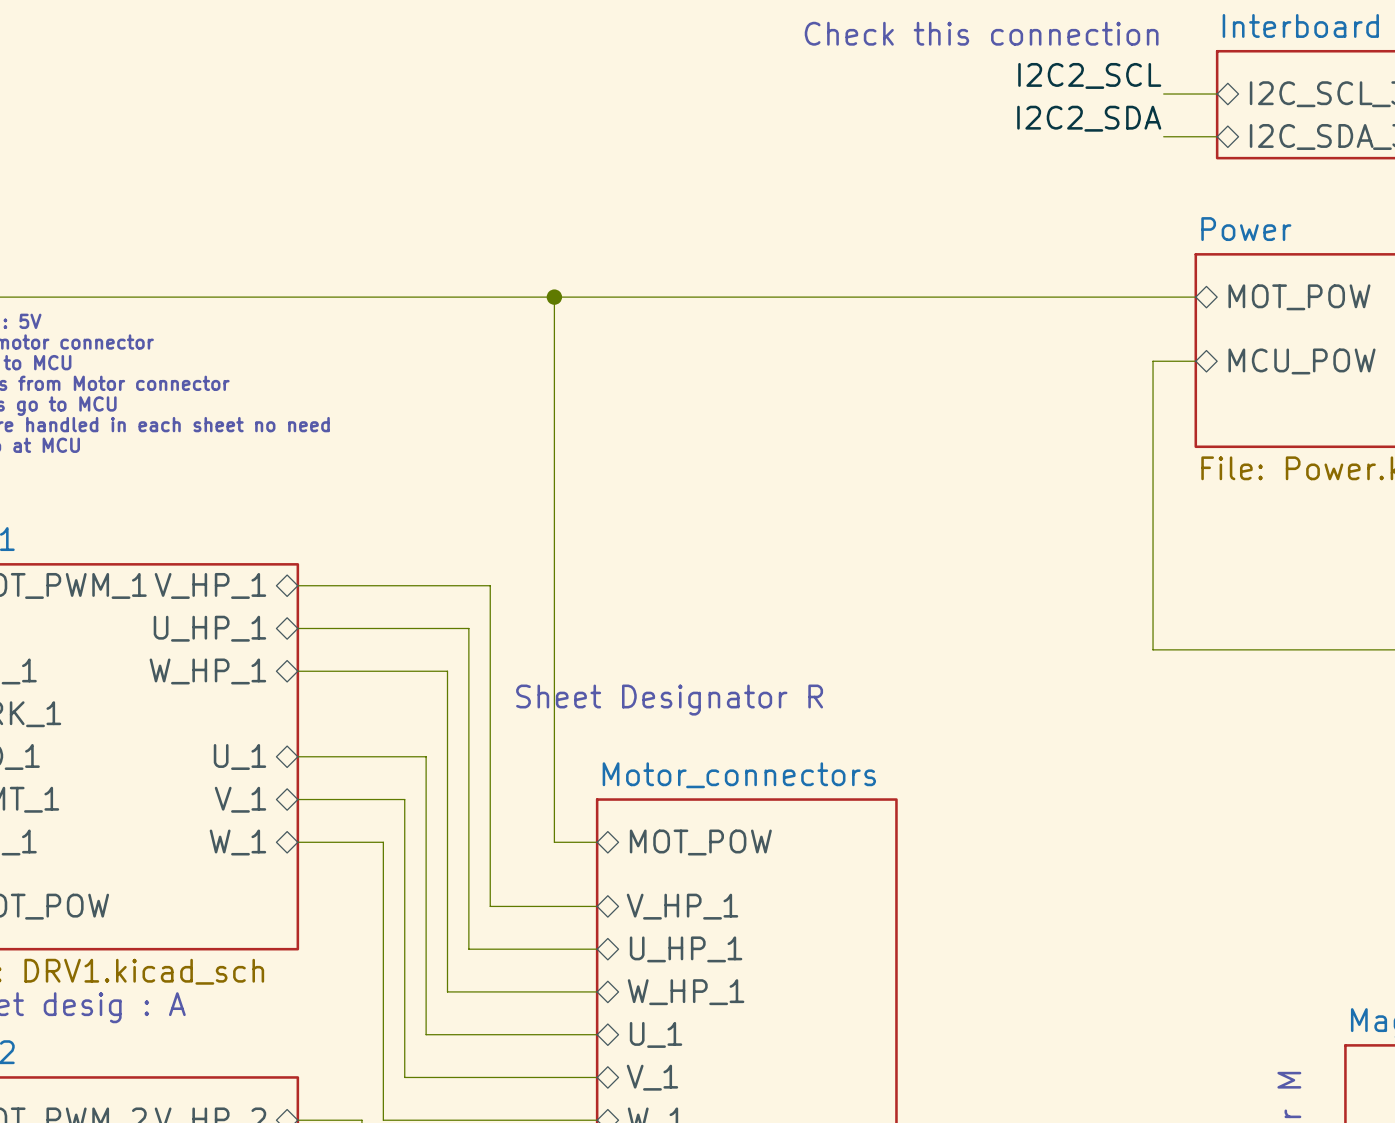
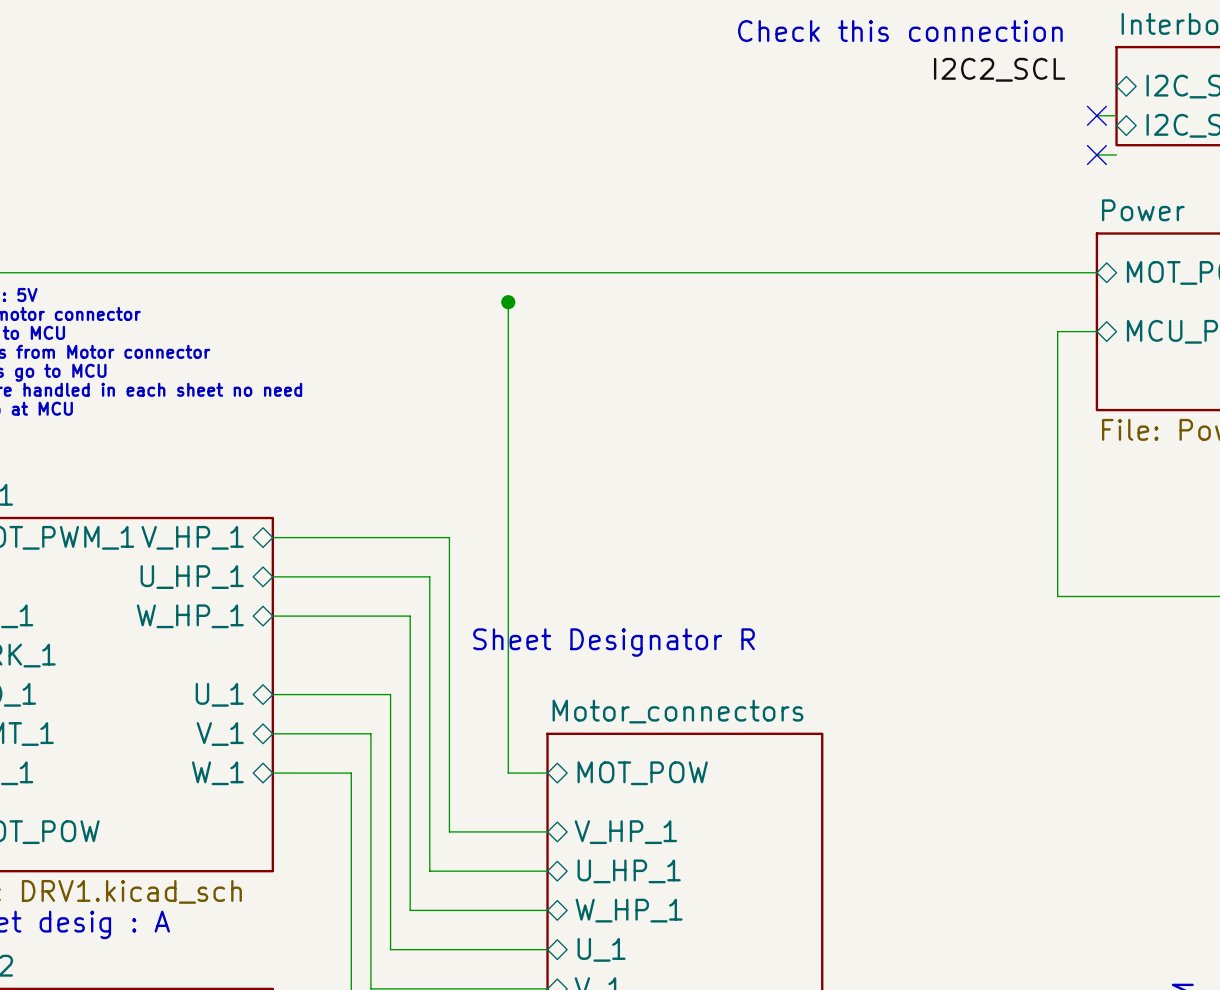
wire: (1163, 94) (1217, 94) -> none
label: I2C2_SDA (1089, 118) -> none
wire: none -> (1096, 115) (1116, 115)
no-connect mark: none -> (1096, 115)
wire: (1163, 136) (1217, 136) -> none
wire: none -> (1096, 155) (1116, 155)
no-connect mark: none -> (1096, 155)
wire: (554, 297) (554, 329) -> none
junction position: (554, 297) -> (508, 302)

